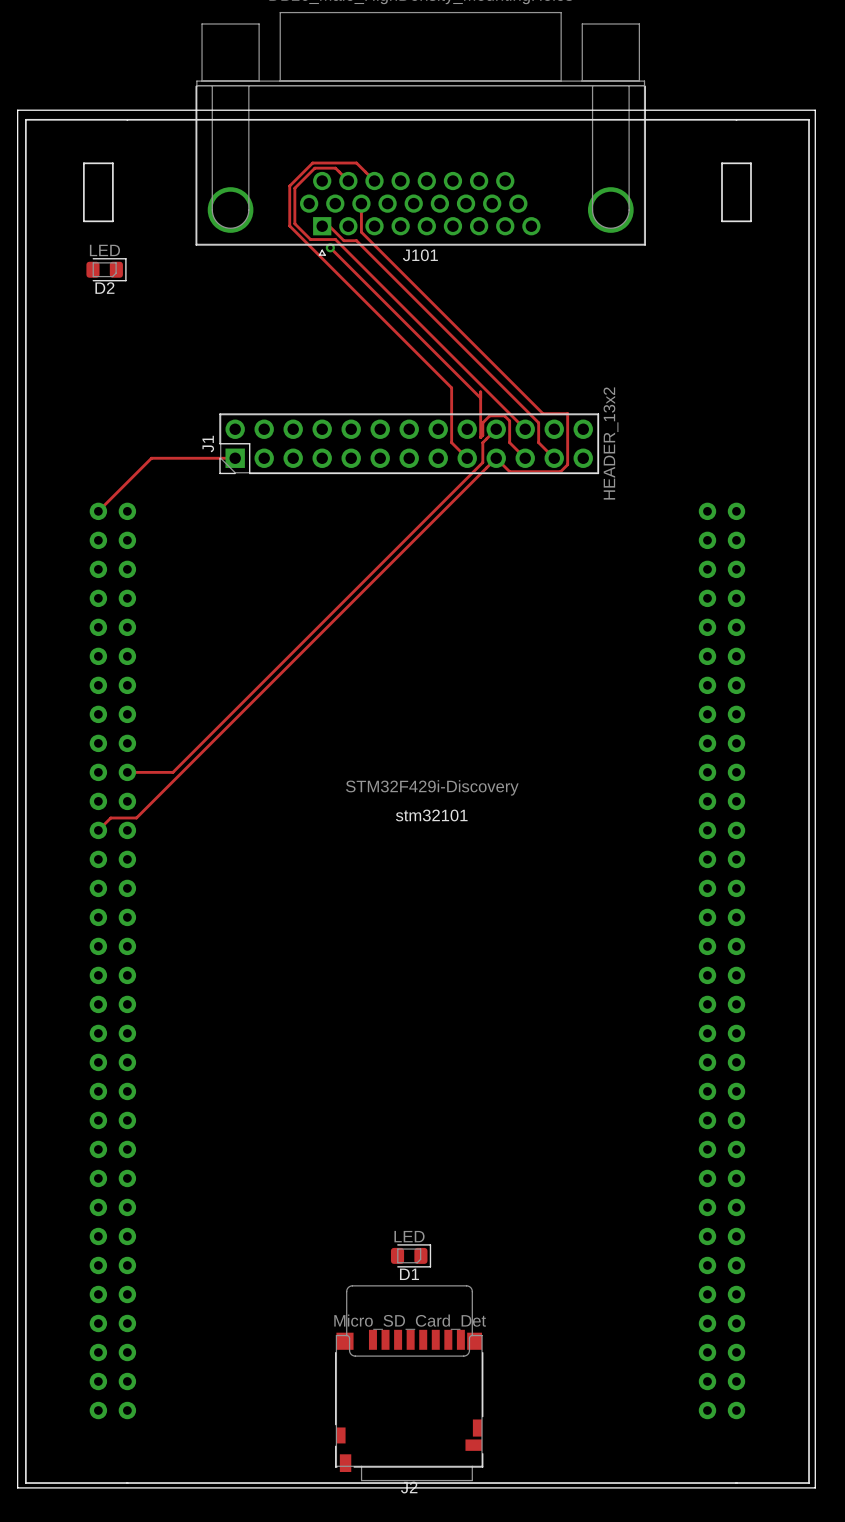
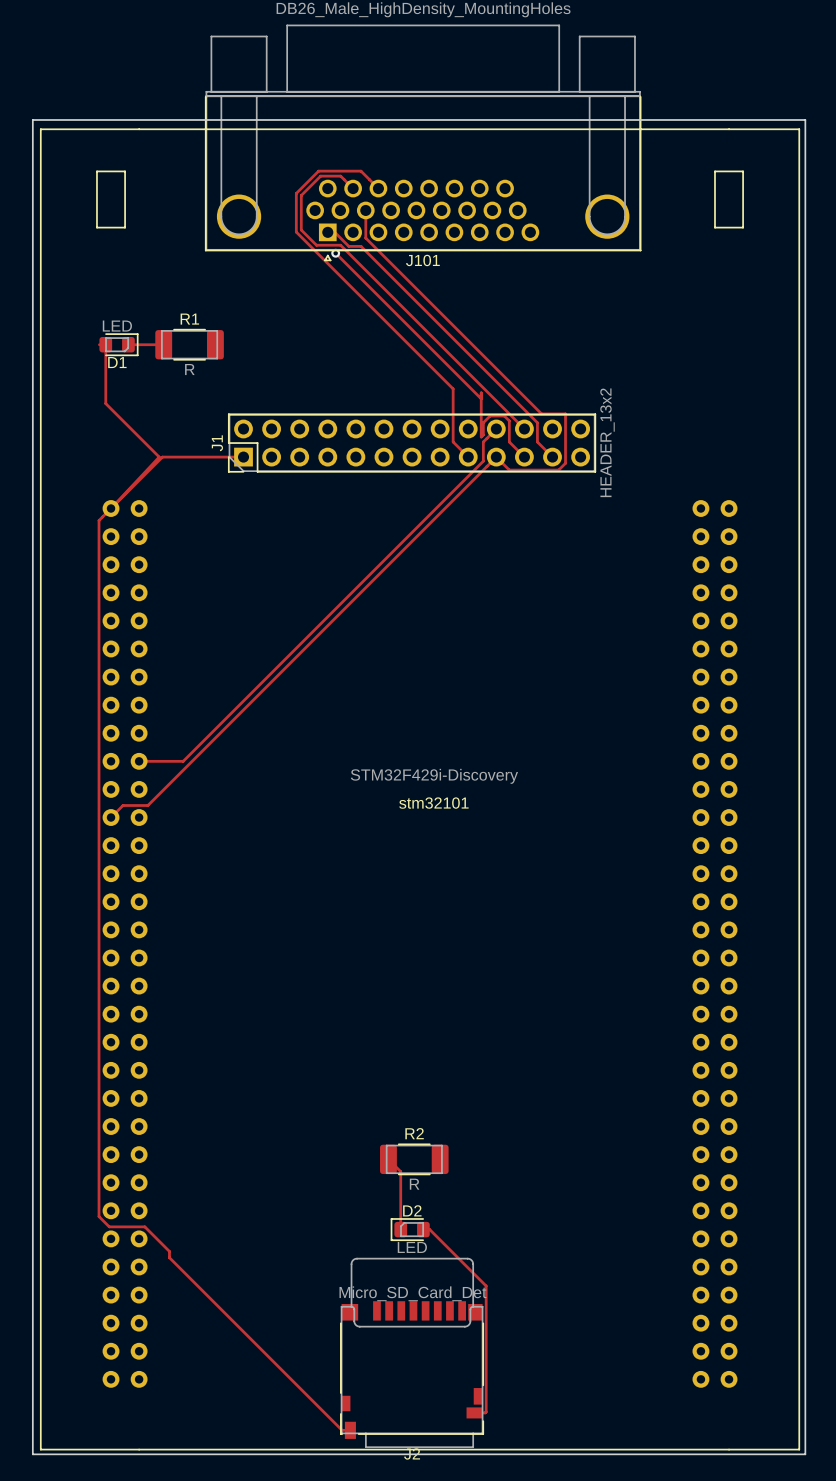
D2 rotation: 0° (106, 269) -> 180° (410, 1229)
D2 position: (106, 269) -> (410, 1229)
track: none -> (99, 344) (105, 344) (105, 403) (159, 457) (99, 520) (99, 1216) (109, 1226) (144, 1226) (169, 1251) (169, 1257) (342, 1430) (350, 1430)
track: none -> (128, 344) (163, 344)
R1: none -> R (189, 344)
track: none -> (388, 1159) (400, 1171) (400, 1229)
R2: none -> R (414, 1159)
D1 position: (411, 1255) -> (118, 344)
track: none -> (423, 1229) (429, 1229) (486, 1286) (486, 1412) (474, 1412)

